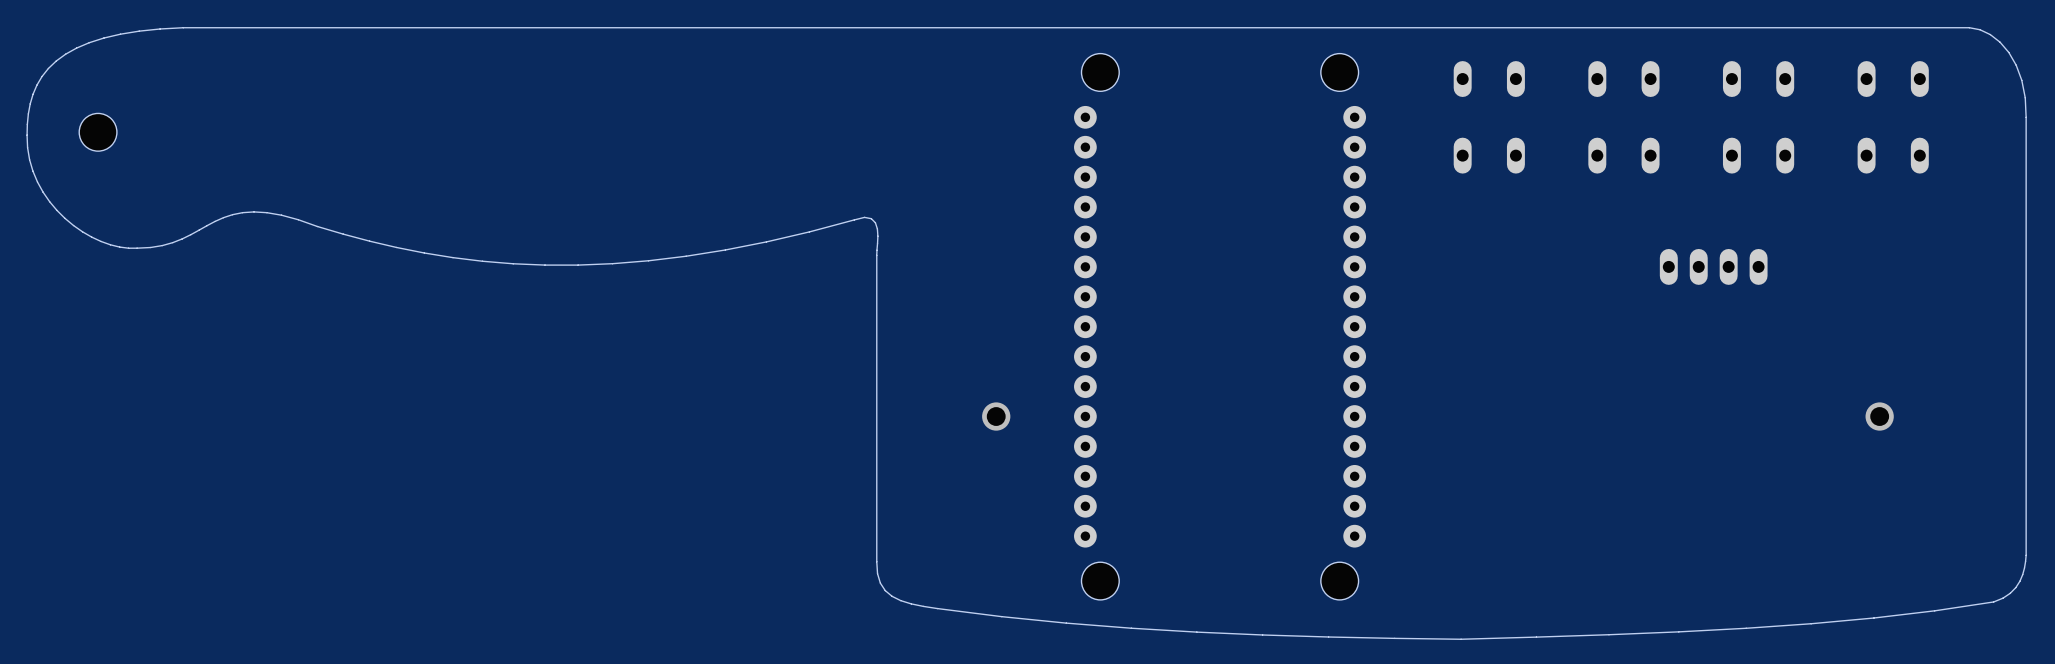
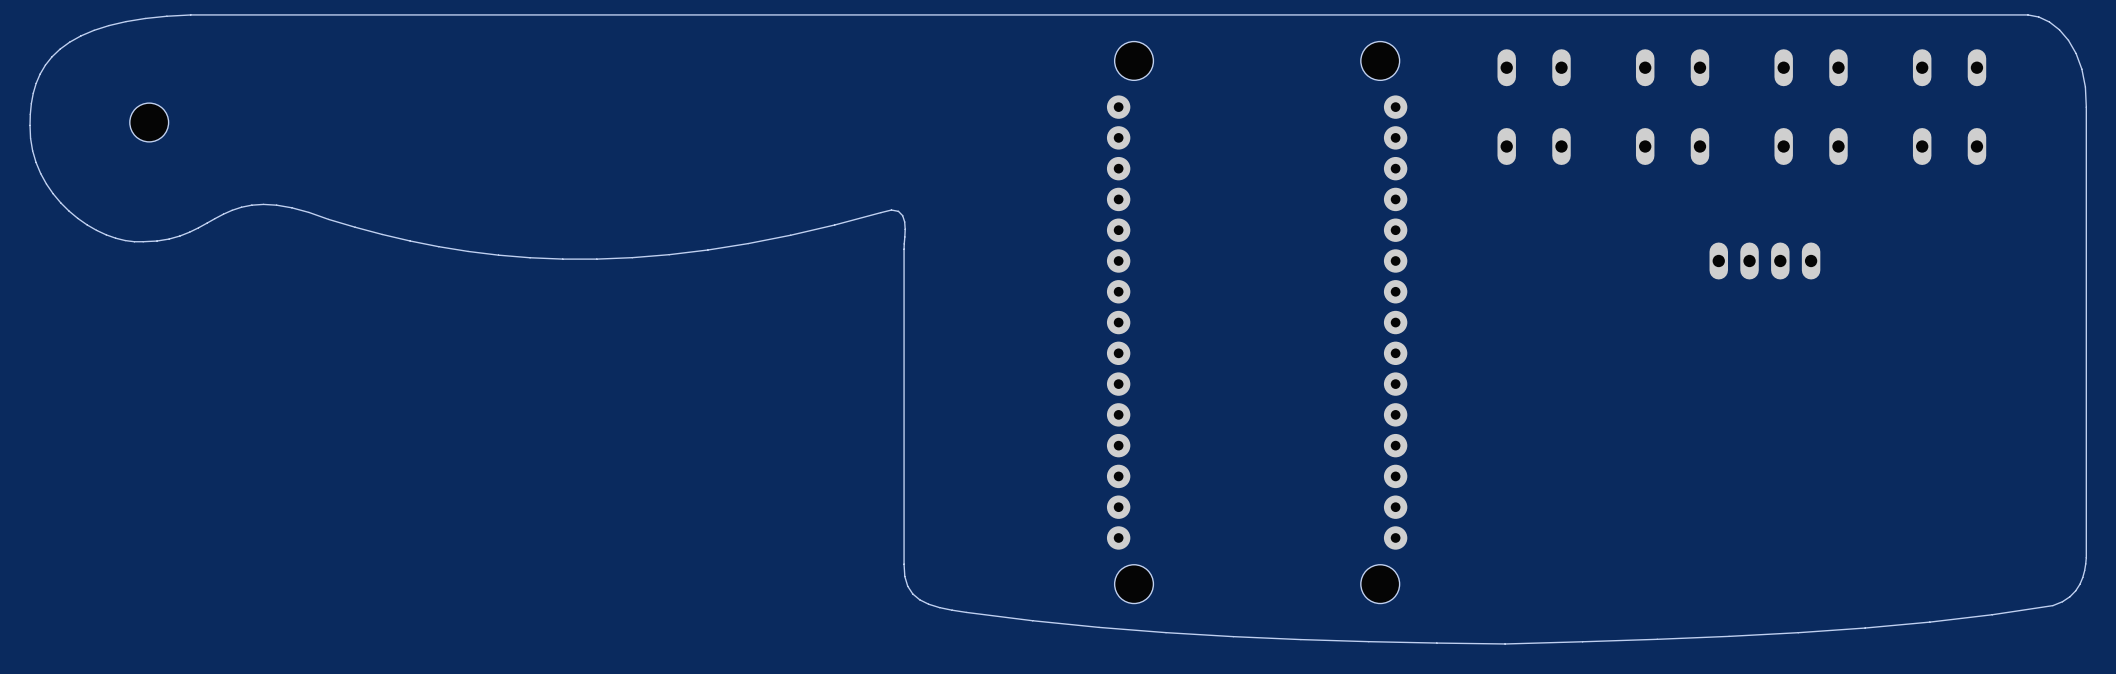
hole: (98, 132) -> none
part: none -> (149, 122)
via: (996, 416) -> none
via: (1879, 416) -> none

